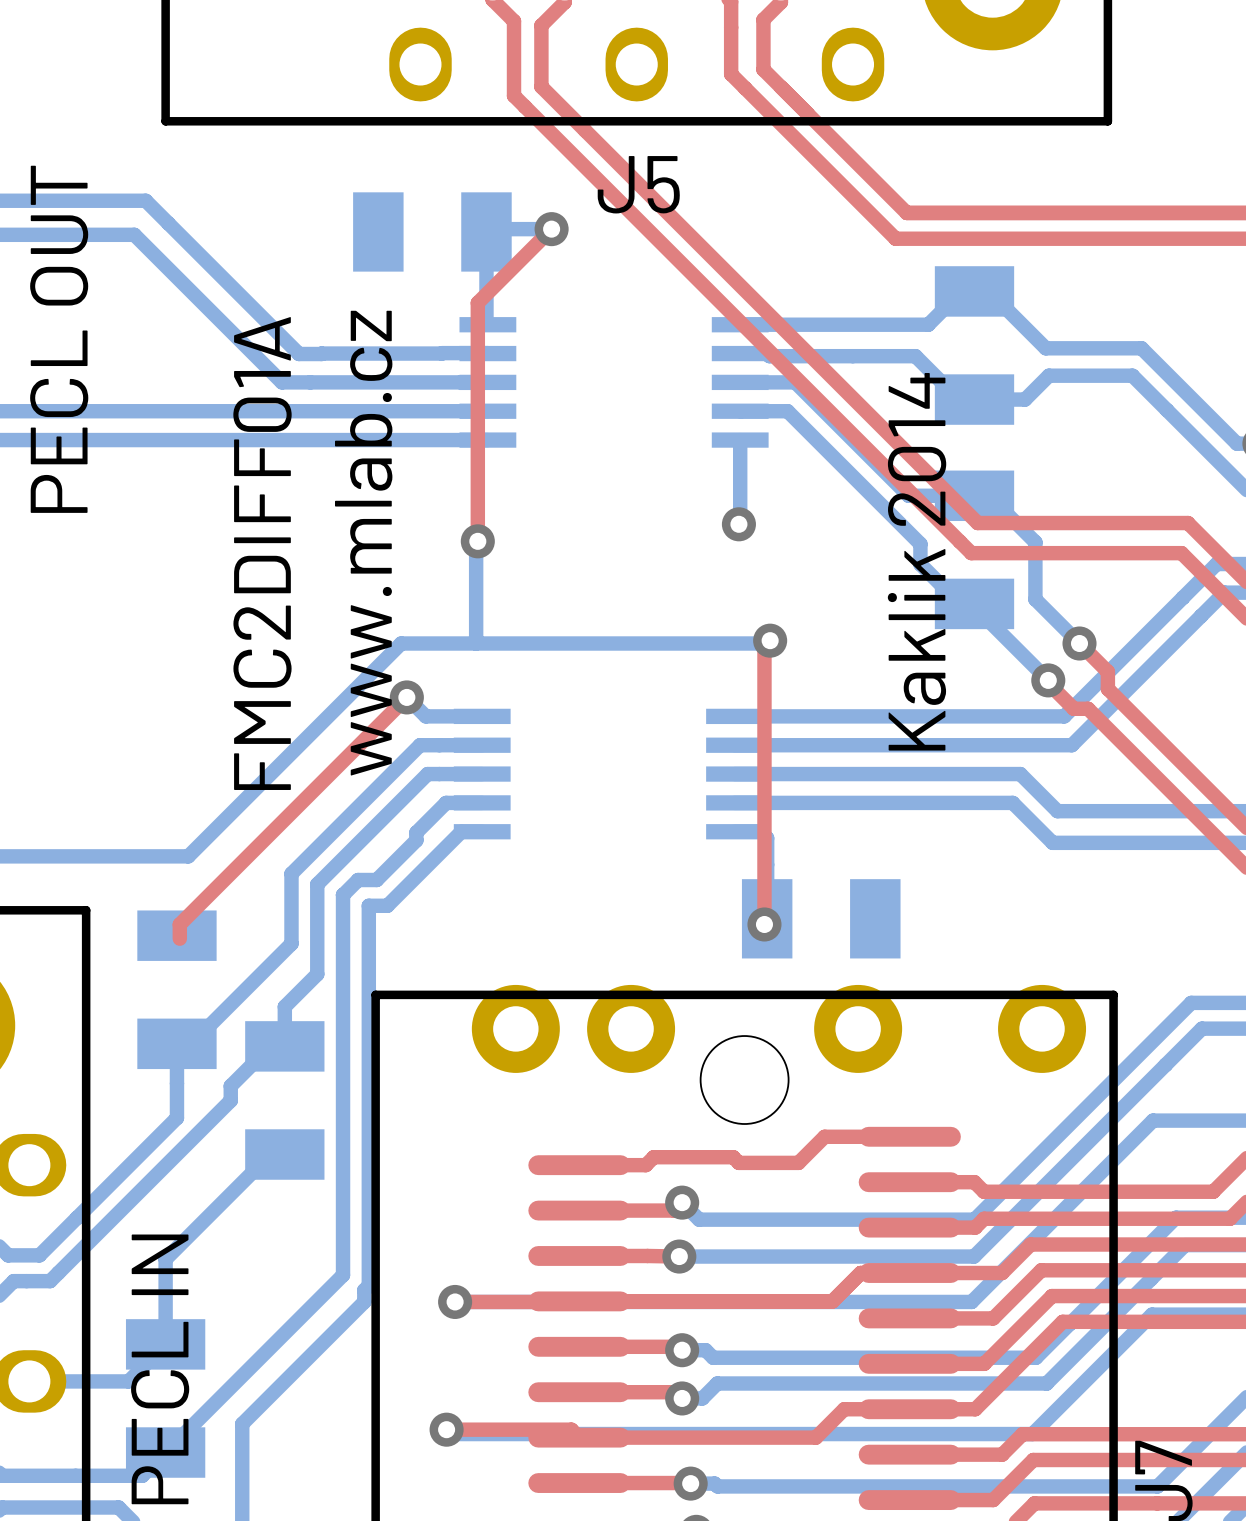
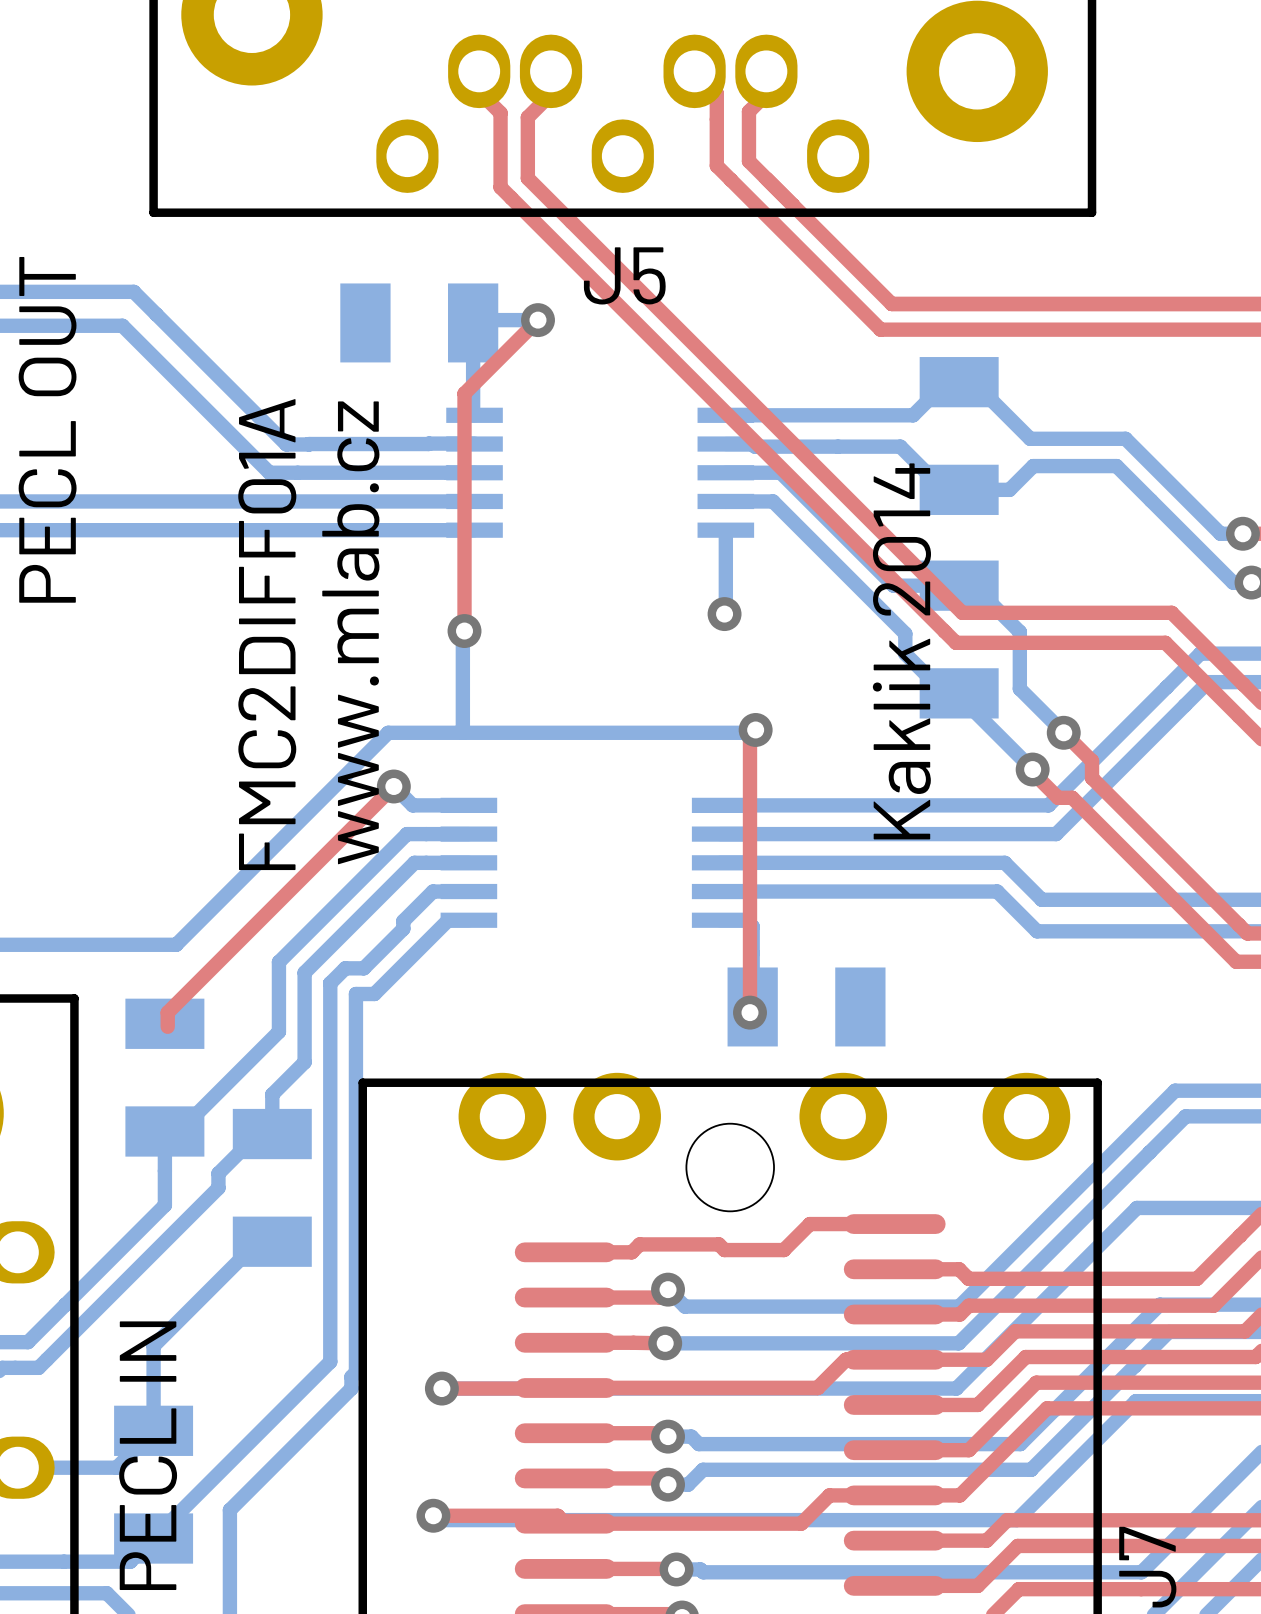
text position: FMC2DIFF01A (262, 553) -> FMC2DIFF01A (267, 634)

